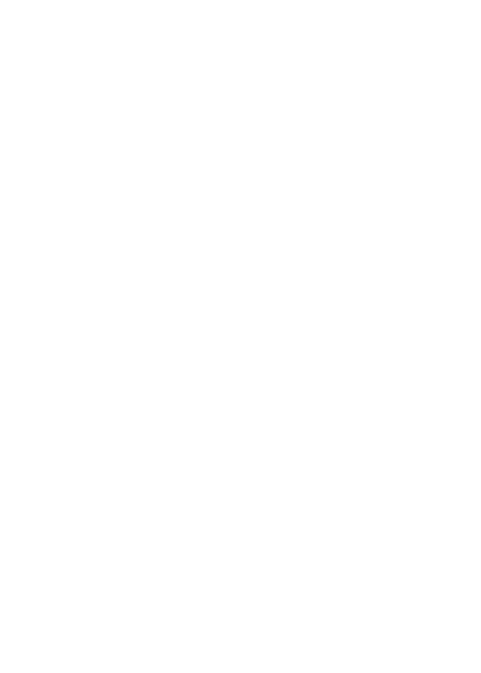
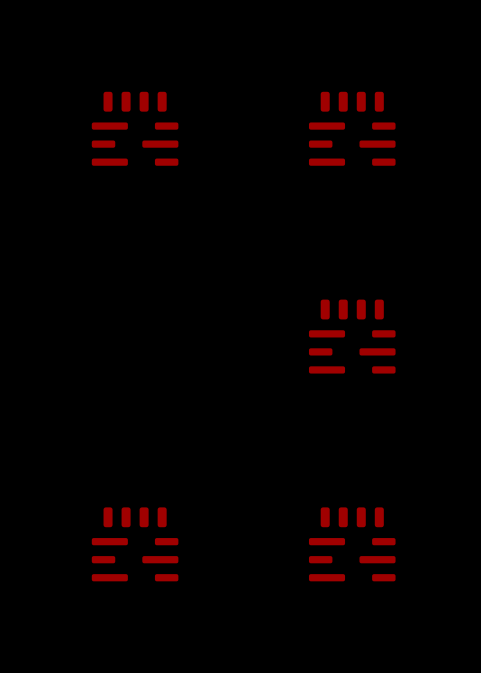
part: none -> (135, 128)
part: none -> (352, 128)
part: none -> (352, 336)
part: none -> (135, 544)
part: none -> (352, 544)

